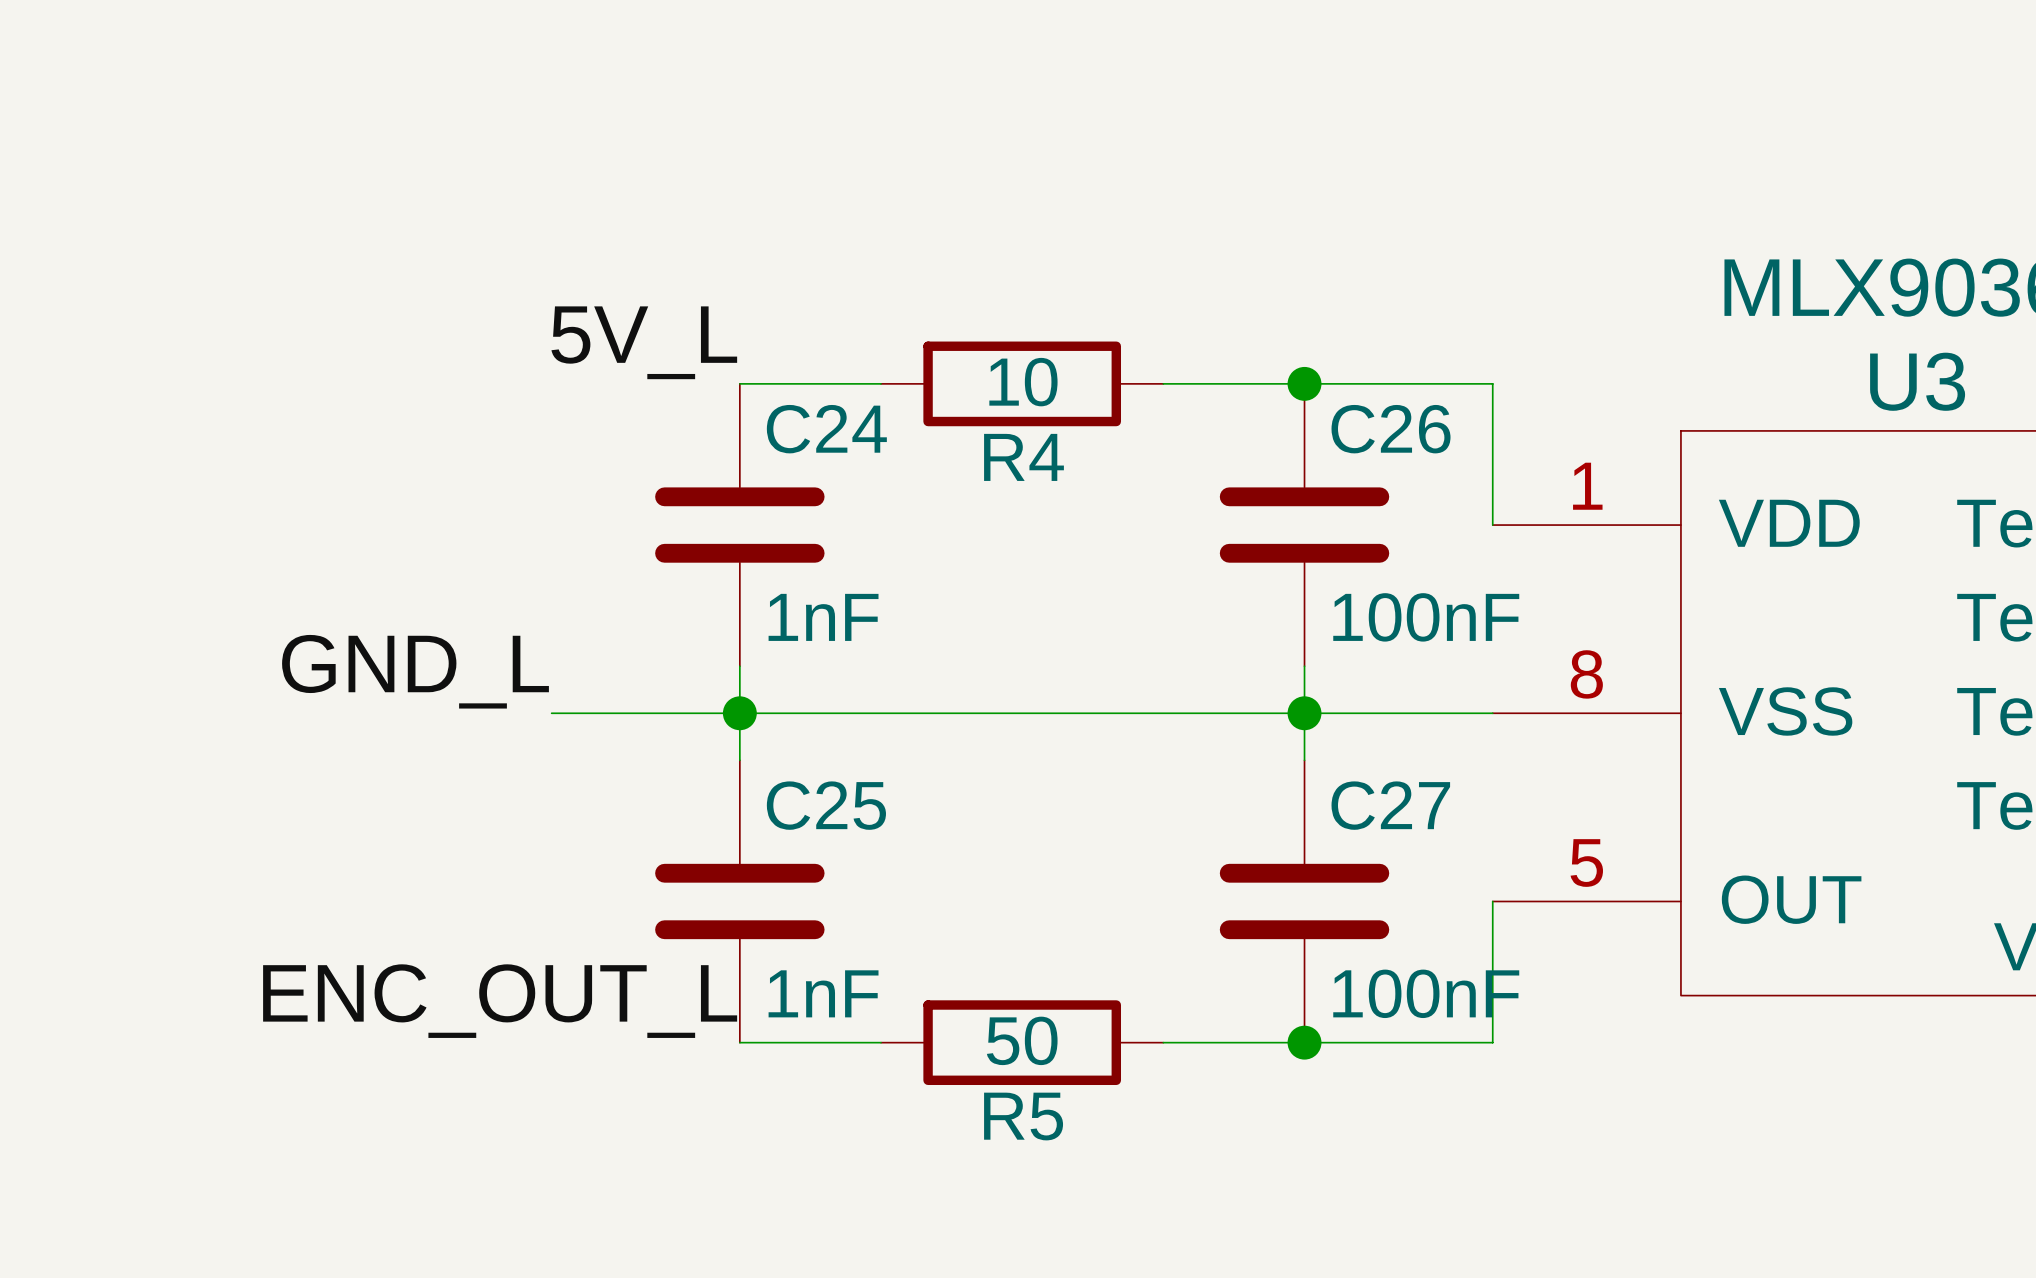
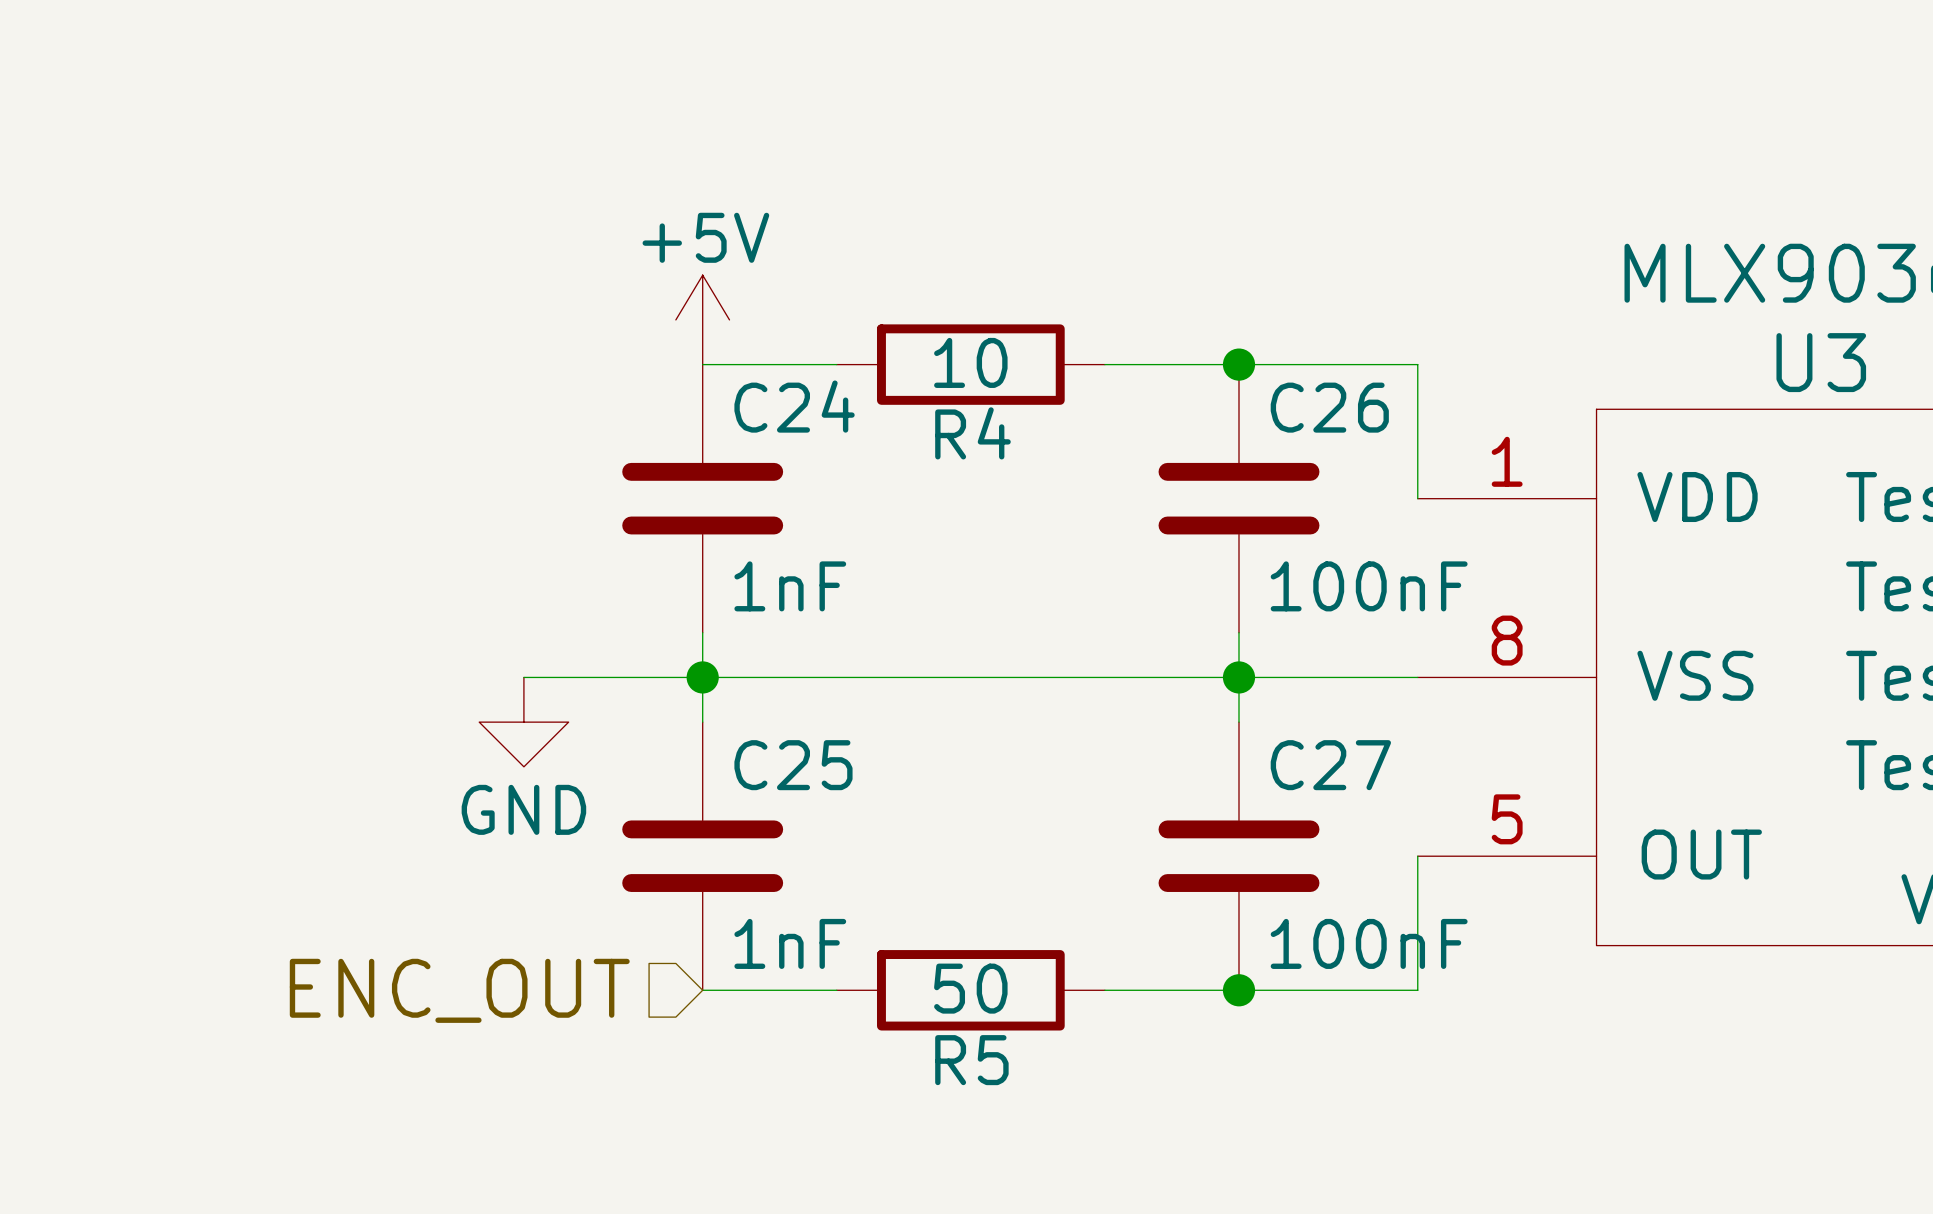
power symbol: none -> +5V (702, 319)
label: 5V_L (644, 342) -> none
label: GND_L (415, 671) -> none
power symbol: none -> GND (523, 722)
label: ENC_OUT_L (500, 1001) -> none
hierarchical label: none -> ENC_OUT (459, 990)

